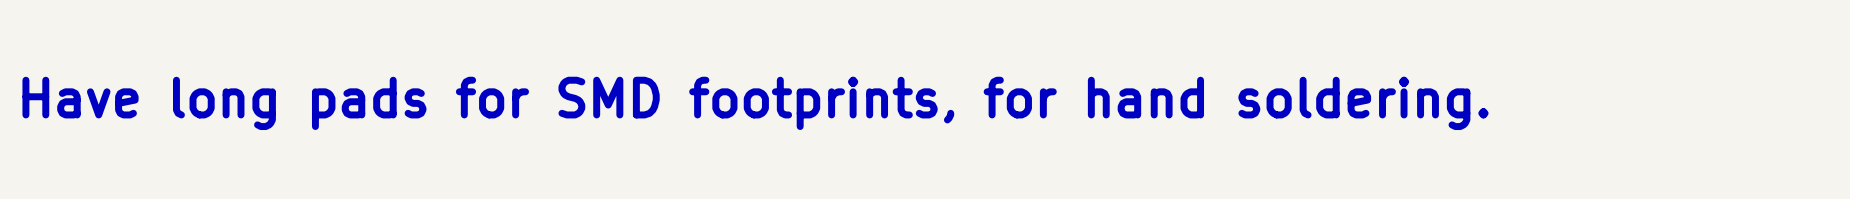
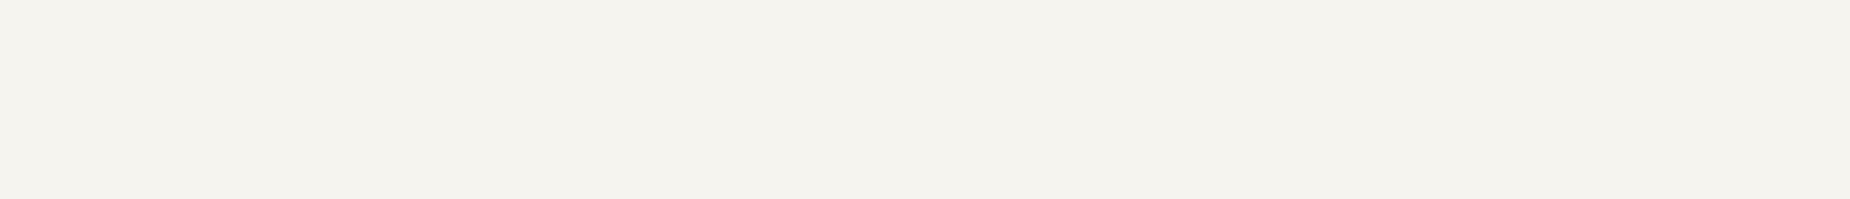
text: Have long pads for SMD footprints, for hand soldering. (755, 103) -> none

